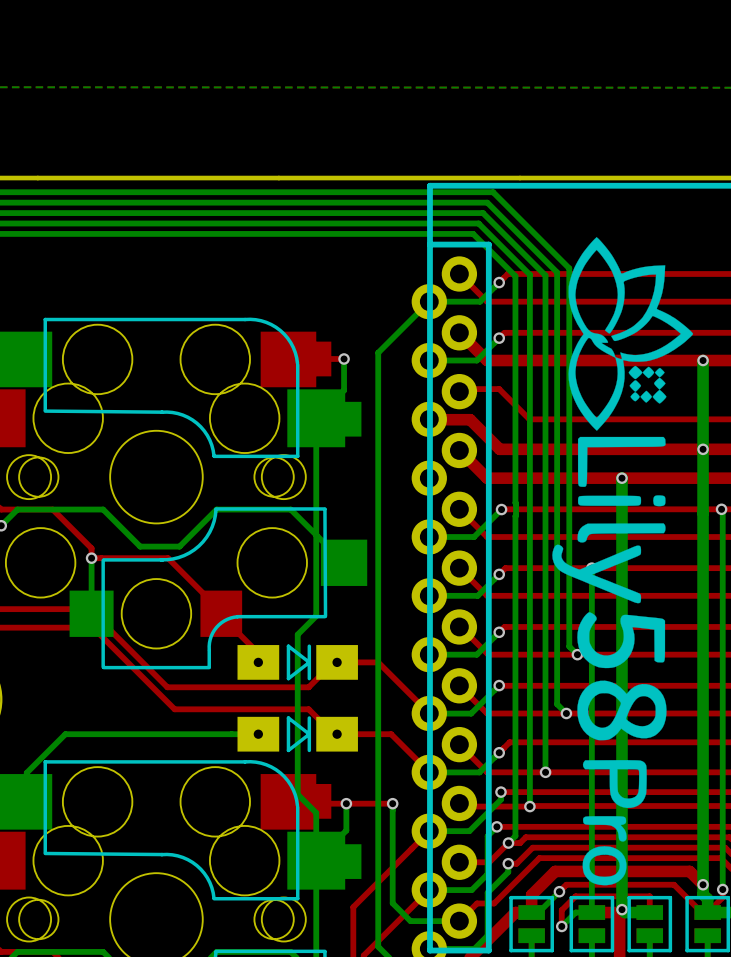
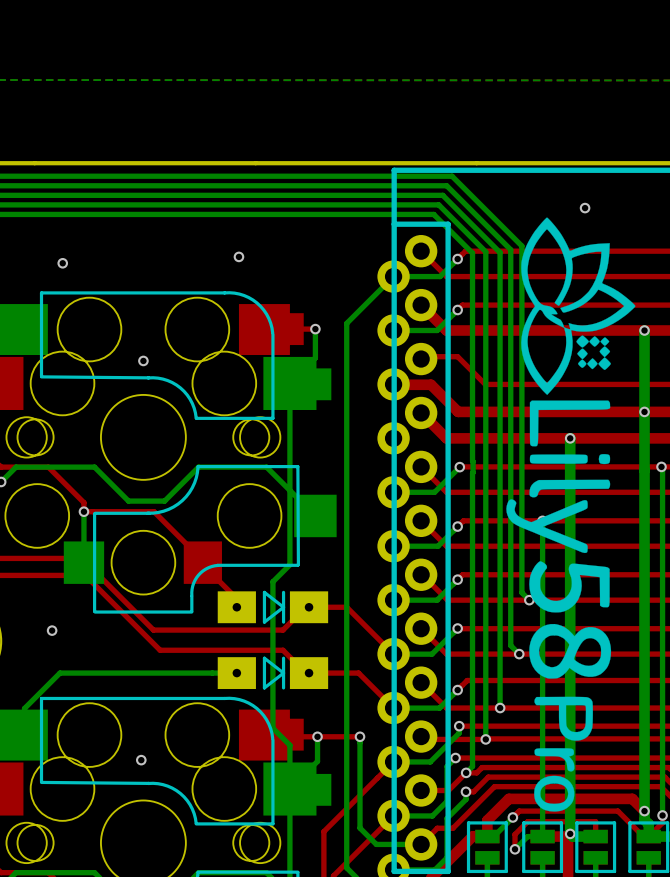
via: none -> (585, 208)
via: none -> (238, 256)
via: none -> (62, 263)
via: none -> (143, 360)
via: none -> (52, 630)
via: none -> (141, 760)

